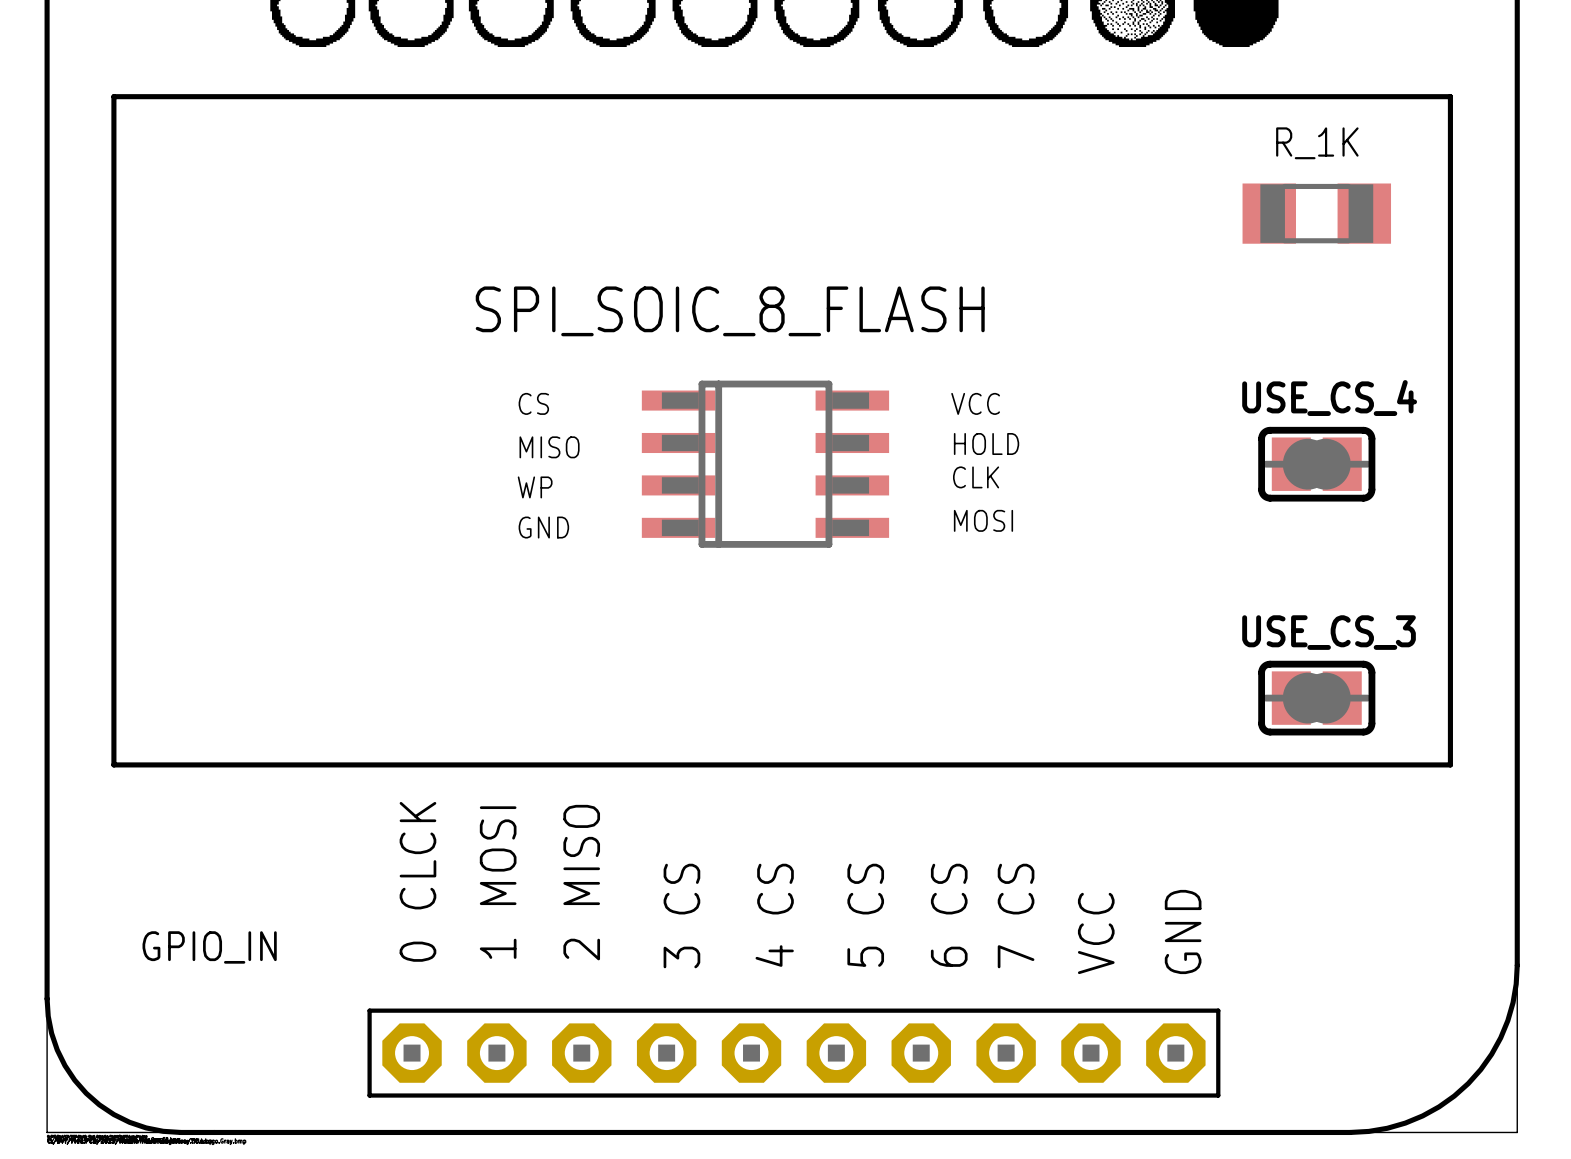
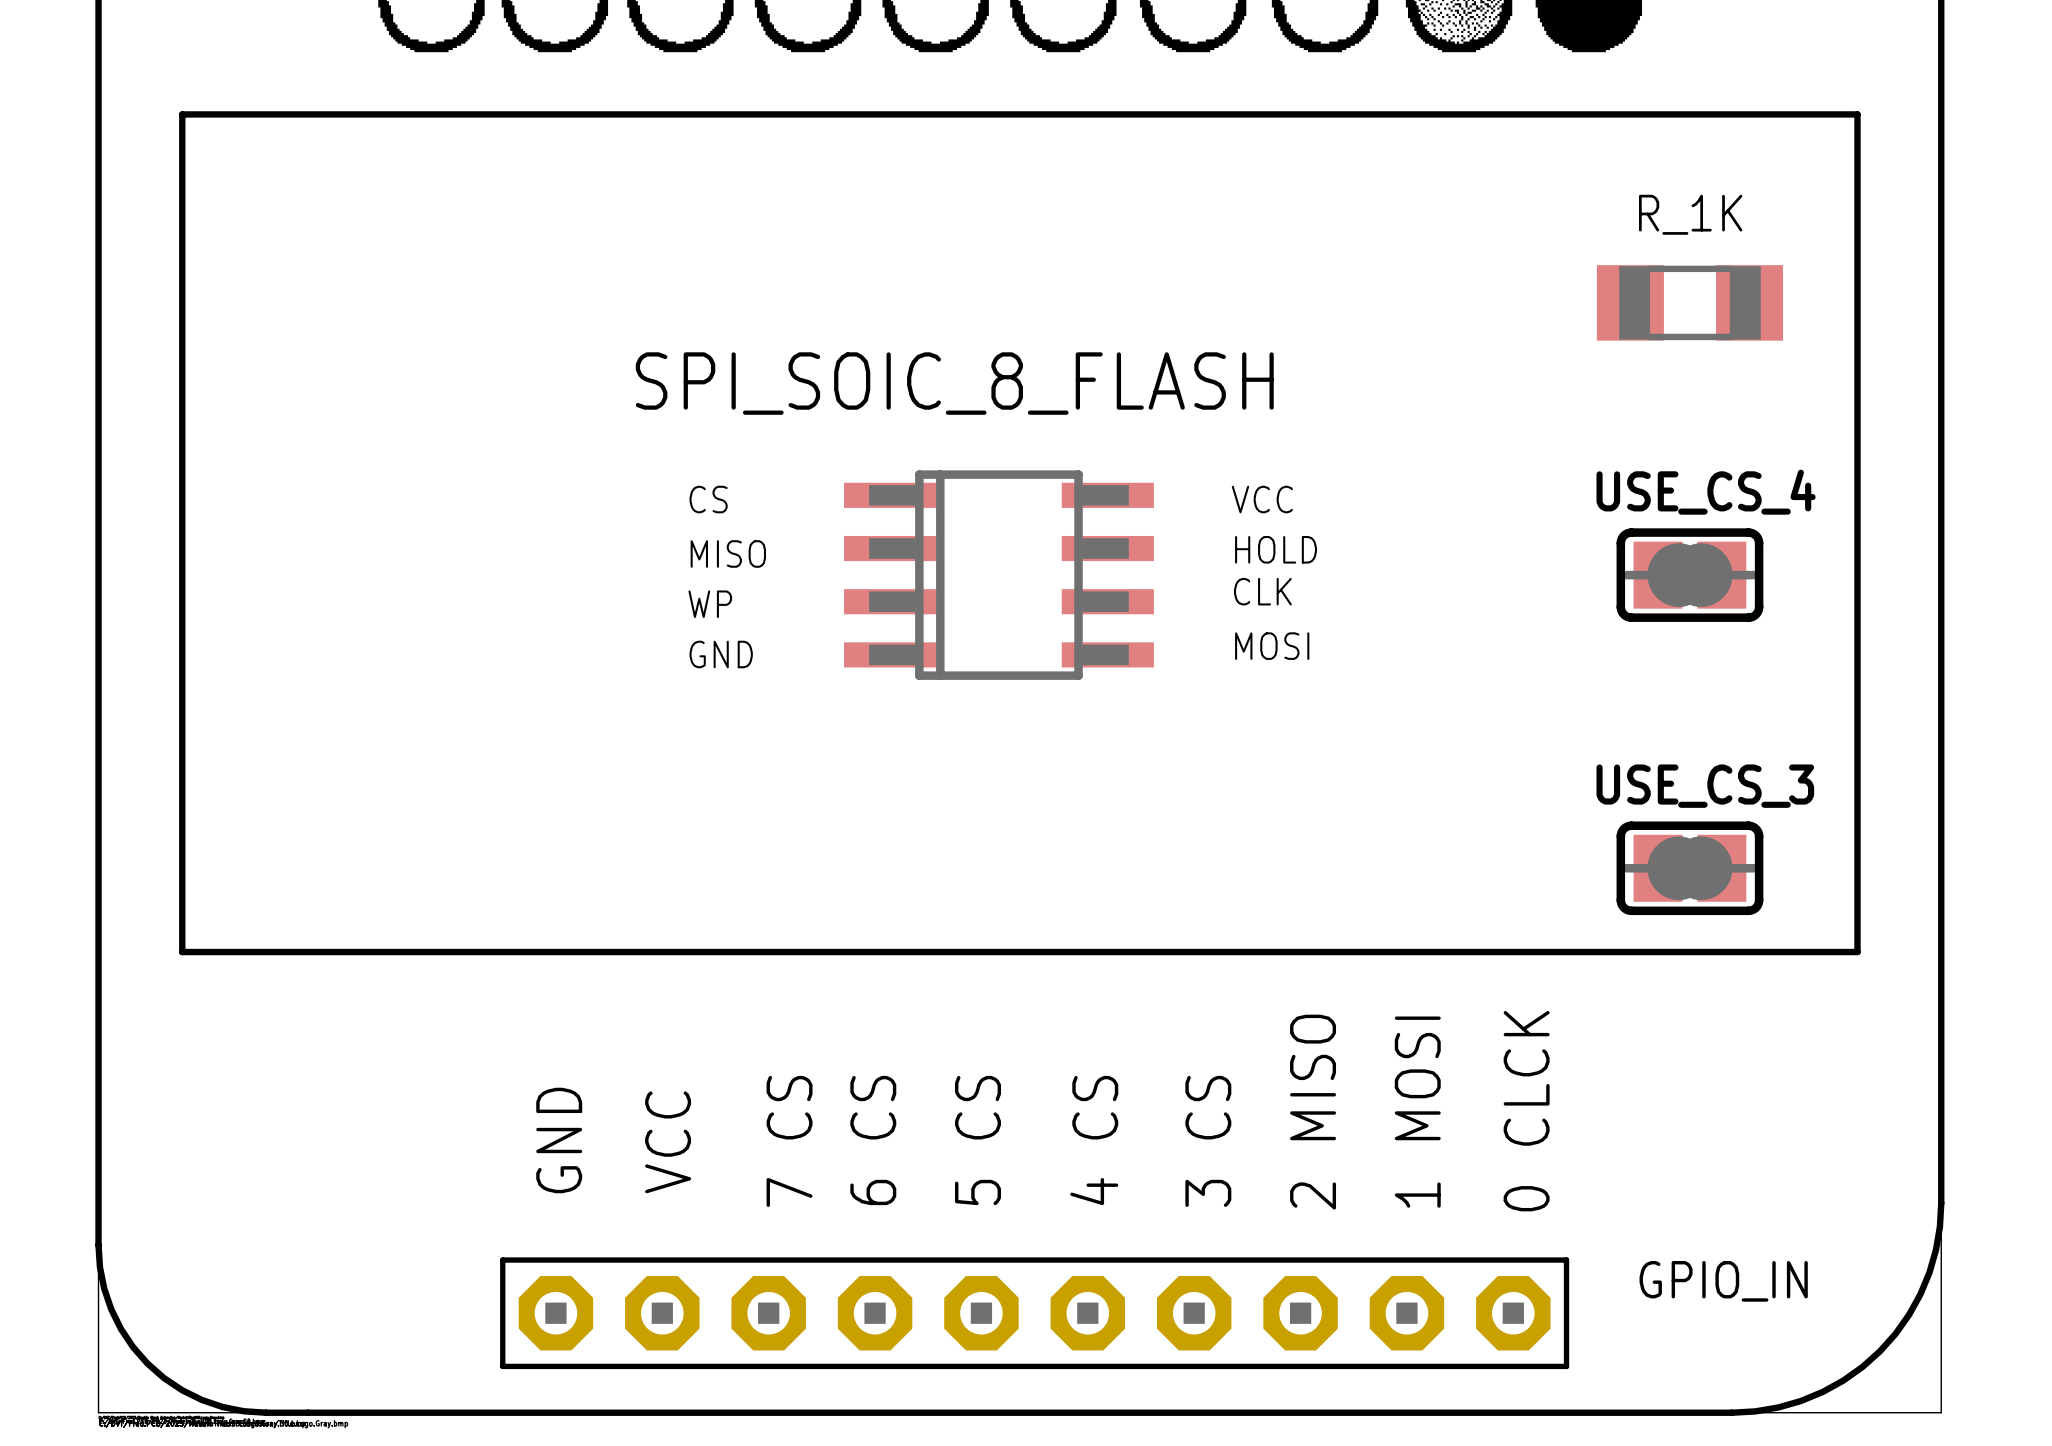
R_1K position: (1316, 213) -> (1689, 302)
text position: 0 CLCK (417, 881) -> 0 CLCK (1526, 1111)
text position: 1 MOSI (498, 882) -> 1 MOSI (1417, 1112)
text position: 2 MISO (581, 882) -> 2 MISO (1313, 1112)
text position: 4 CS (774, 915) -> 4 CS (1094, 1140)
text position: 5 CS (865, 915) -> 5 CS (978, 1140)
text position: 6 CS (949, 915) -> 6 CS (873, 1140)
text position: 3 CS (681, 916) -> 3 CS (1208, 1141)
text position: 7 CS (1016, 916) -> 7 CS (789, 1141)
text position: GND (1183, 931) -> GND (559, 1140)
text position: VCC (1096, 933) -> VCC (668, 1142)
GPIO_IN name position: GPIO_IN (209, 947) -> GPIO_IN (1723, 1281)

